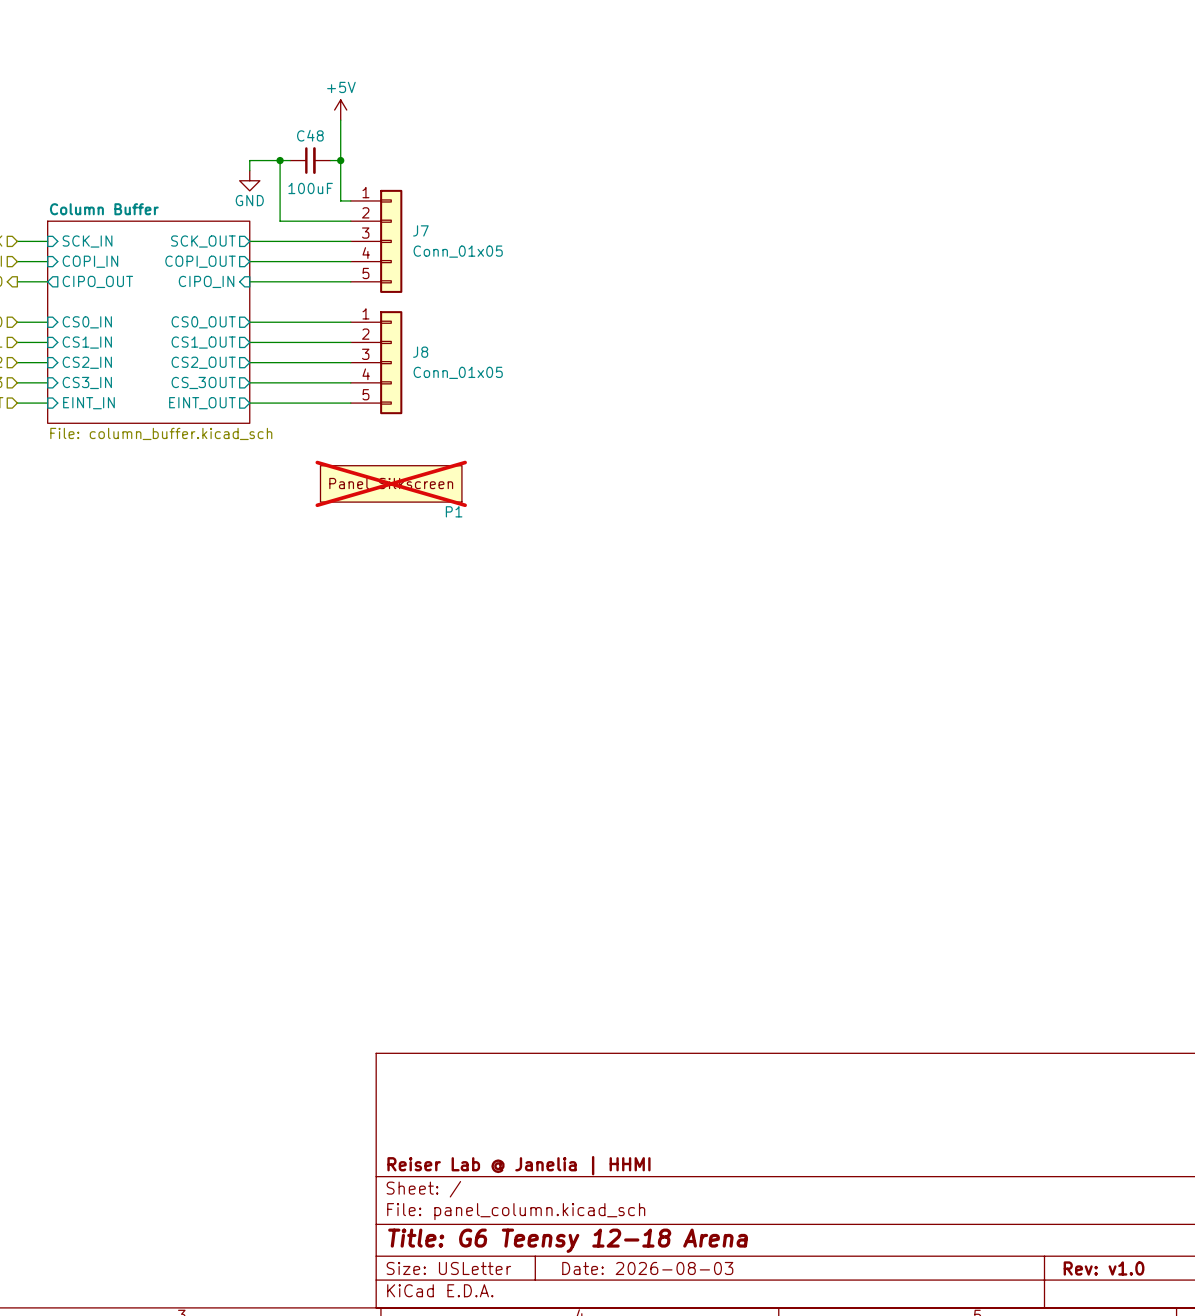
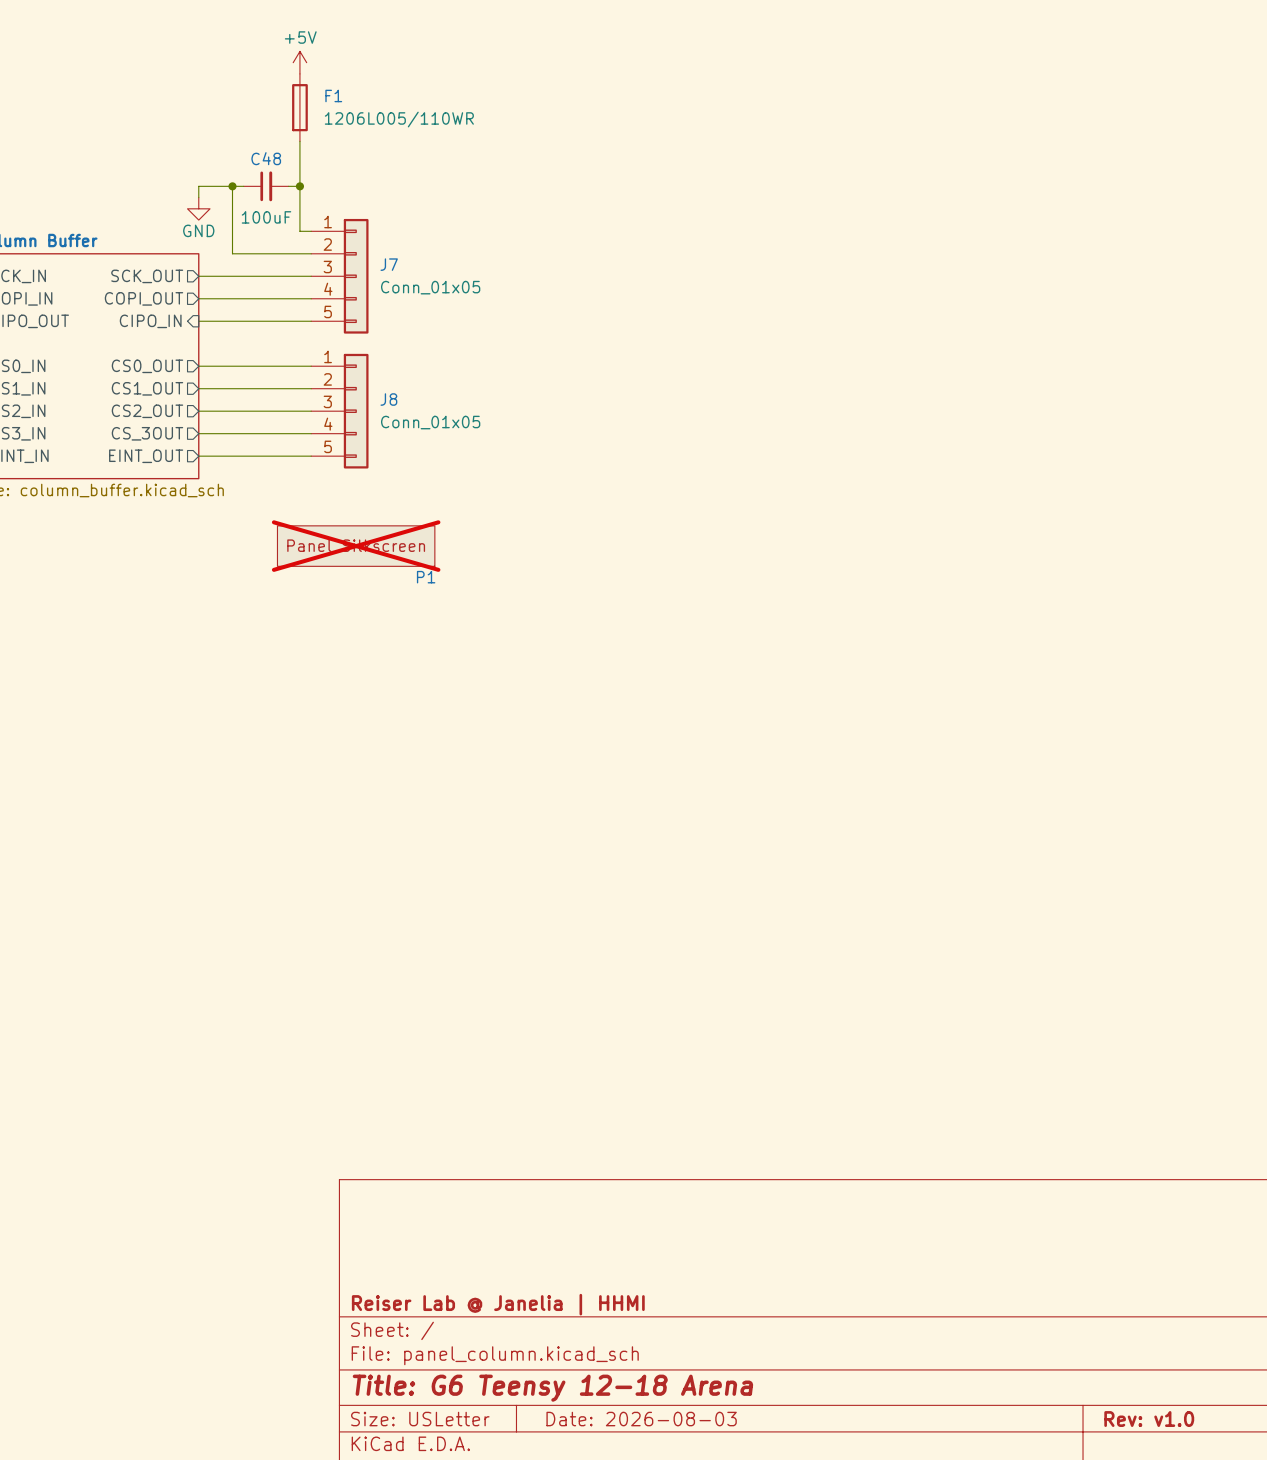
F1: none -> 1206L005/110WR (299, 107)
power symbol position: +5V (340, 110) -> +5V (299, 62)

